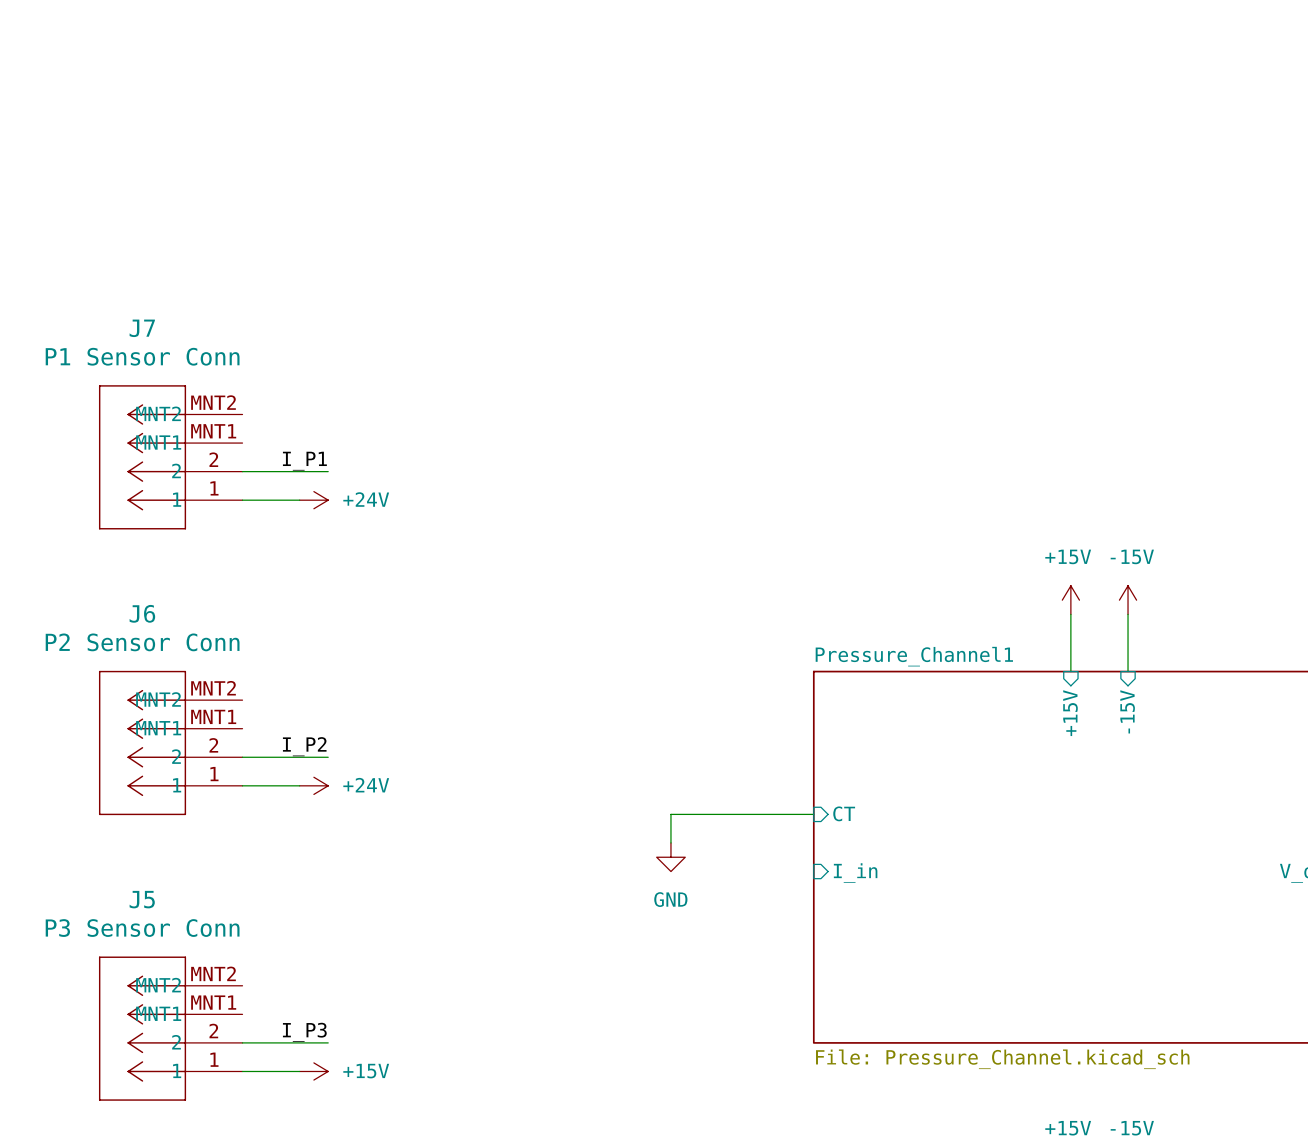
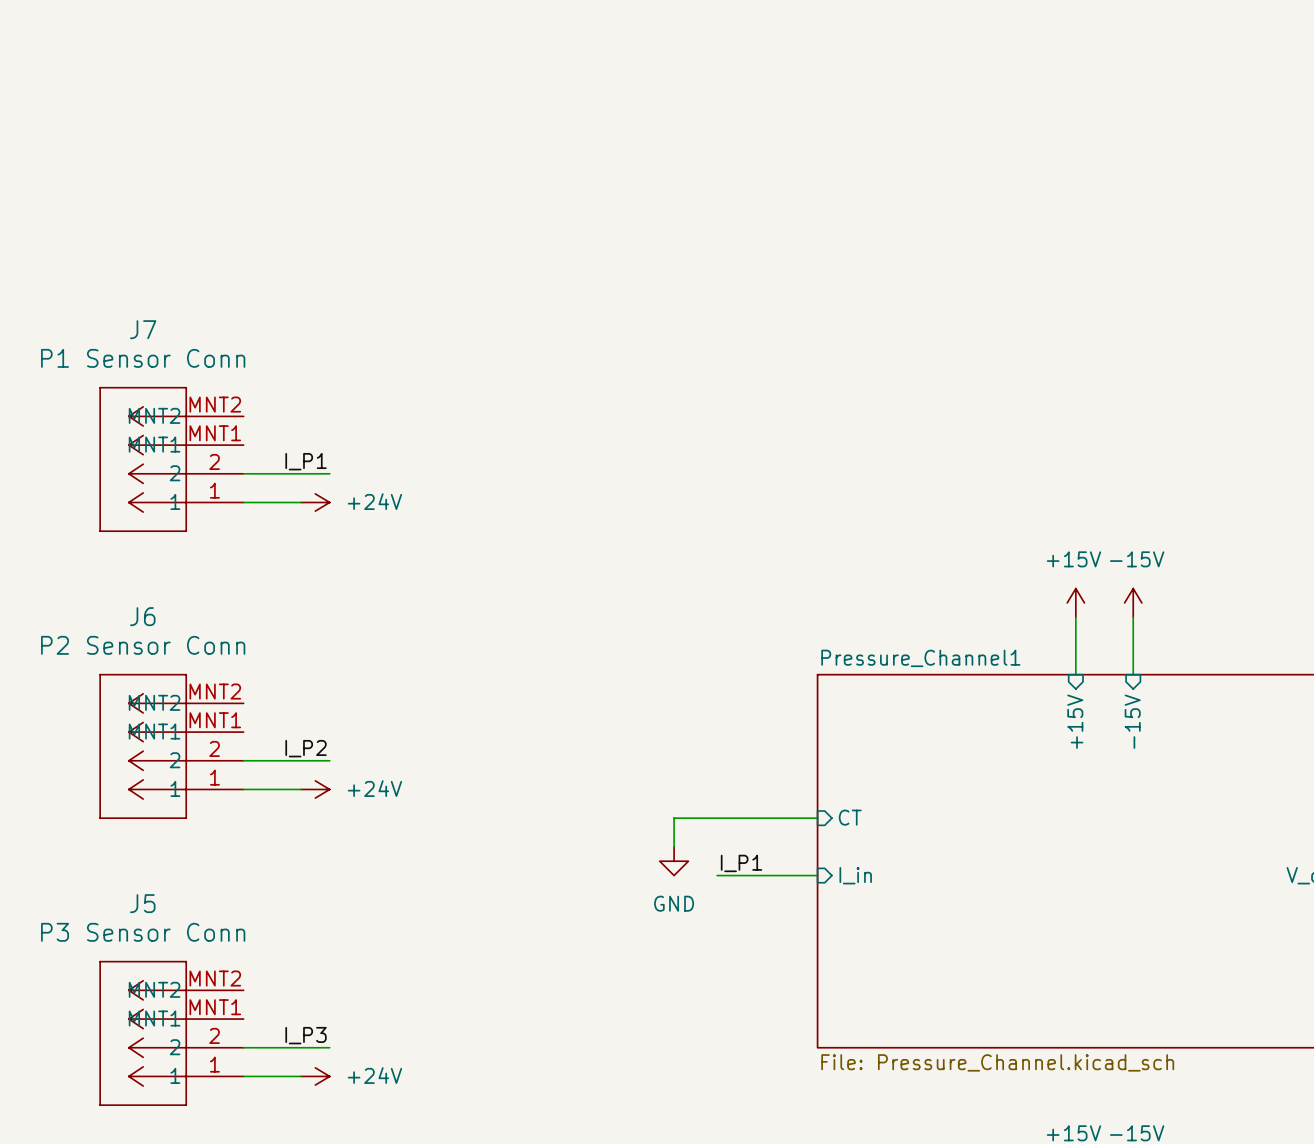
label: none -> I_P1 (741, 863)
wire: none -> (717, 875) (817, 875)
power symbol: +15V (313, 1071) -> +24V (315, 1076)

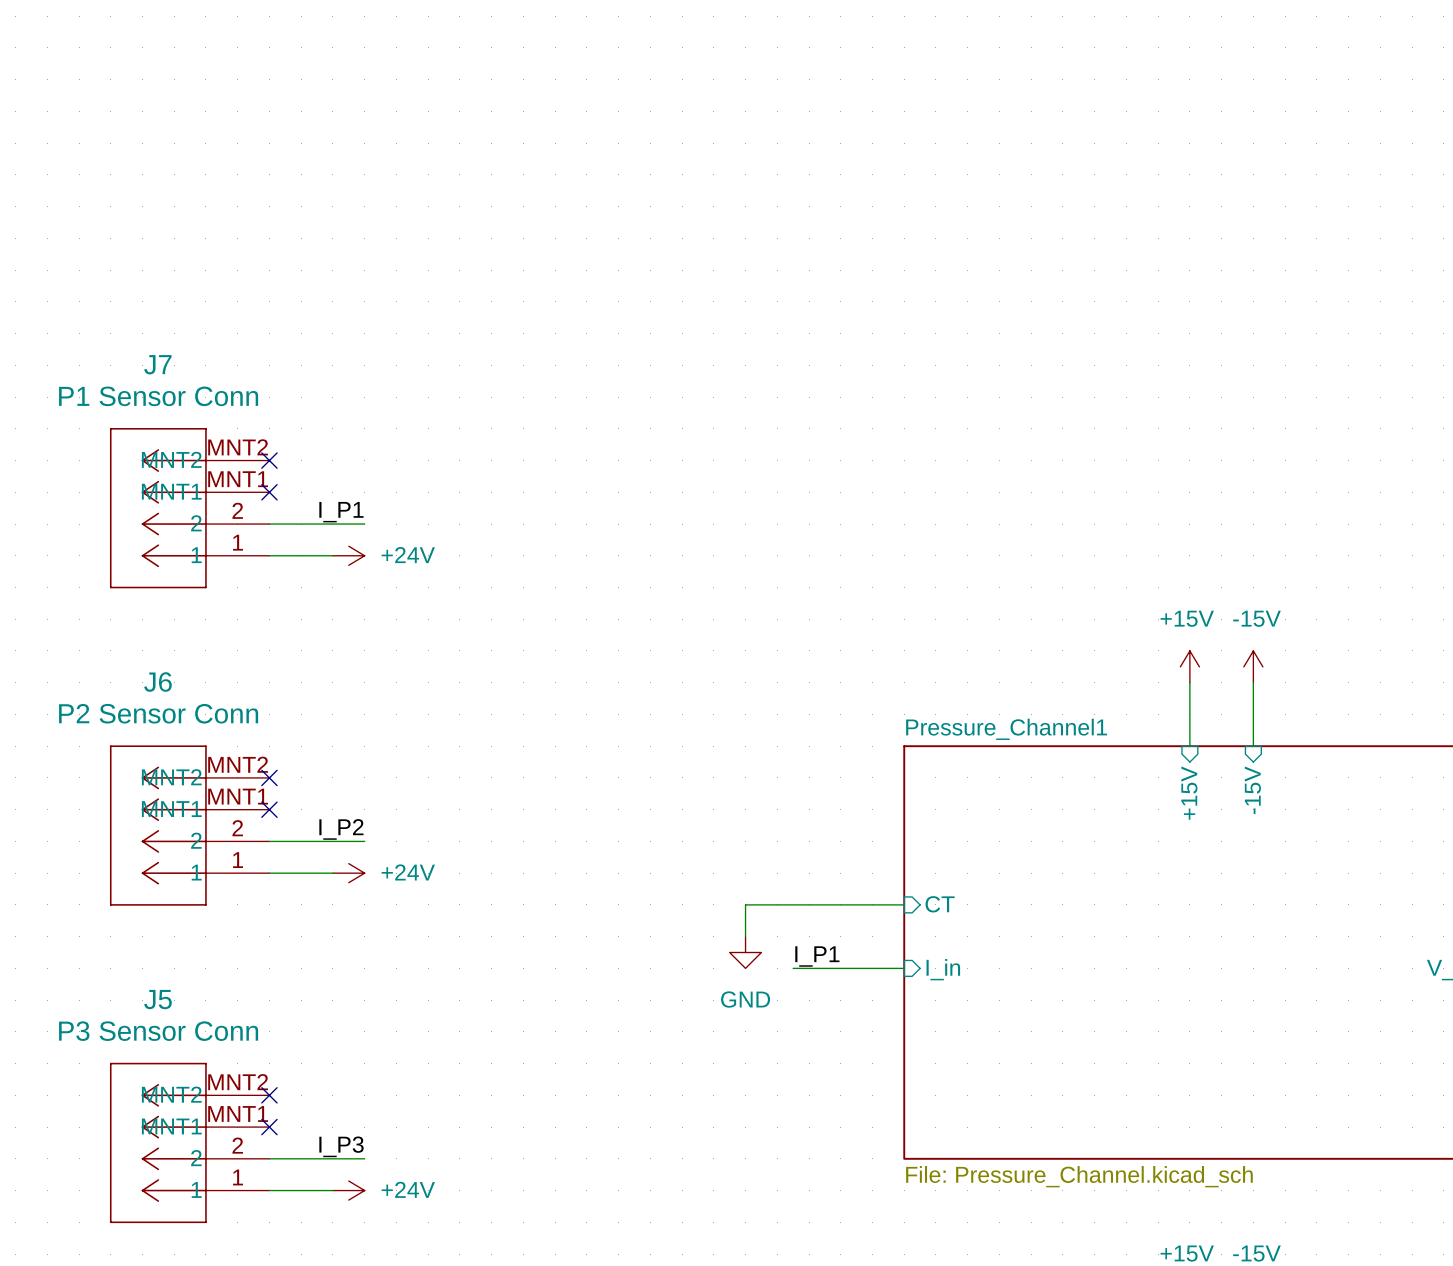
no-connect mark: none -> (269, 460)
no-connect mark: none -> (269, 492)
no-connect mark: none -> (269, 777)
no-connect mark: none -> (269, 809)
no-connect mark: none -> (269, 1095)
no-connect mark: none -> (269, 1127)

